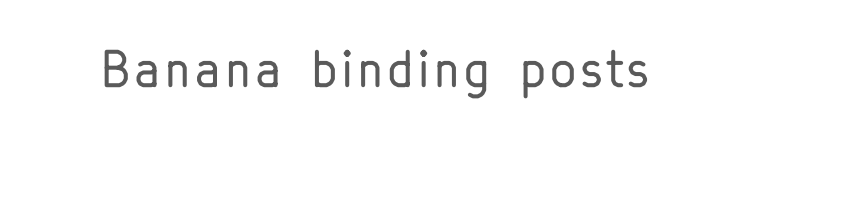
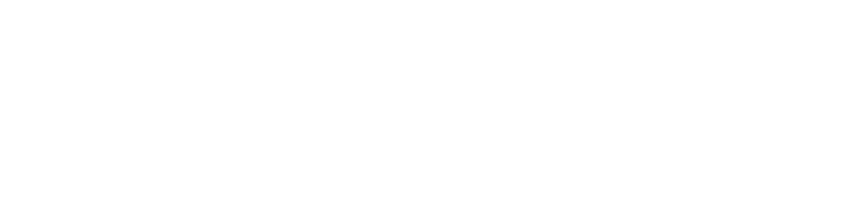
text: Banana binding posts (375, 74) -> none

